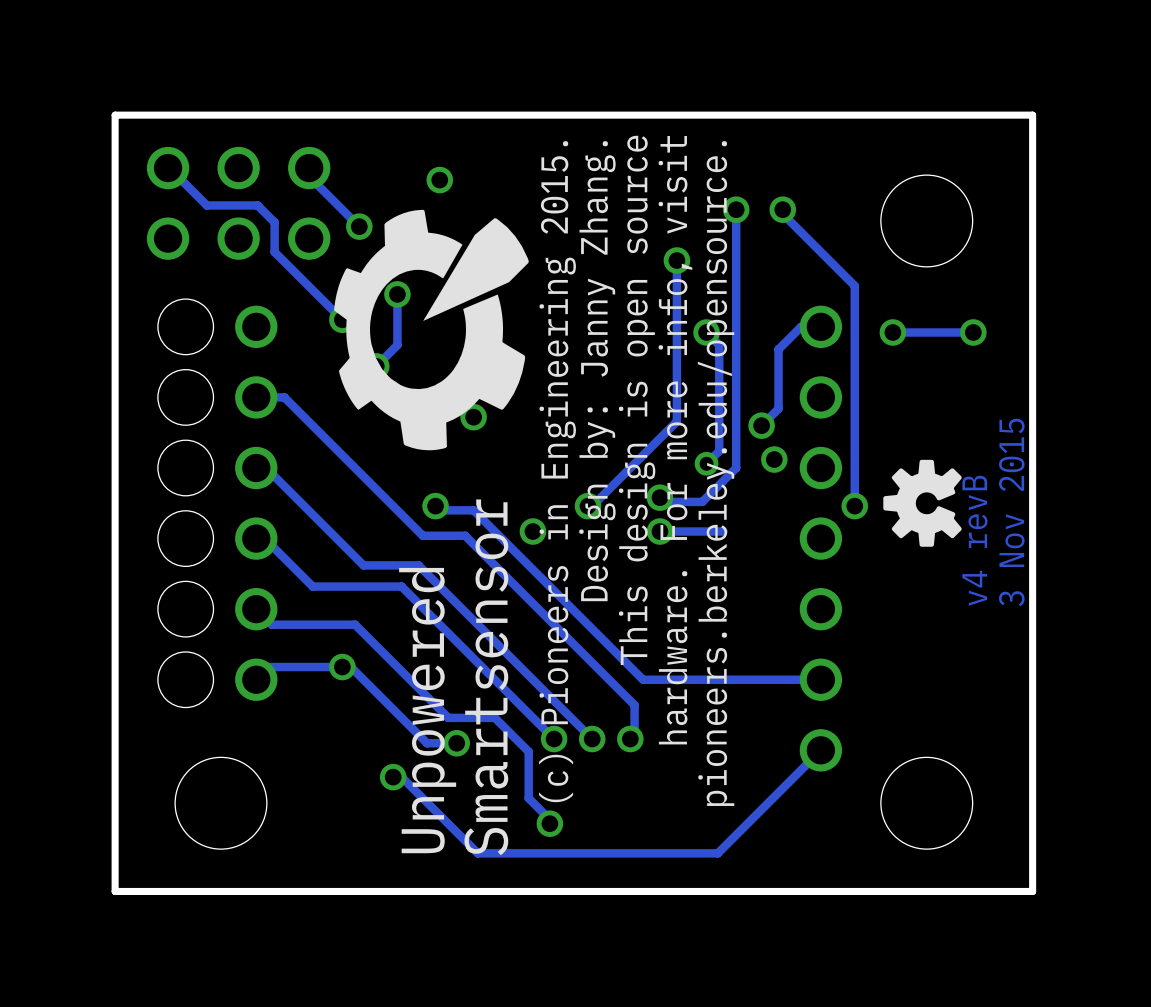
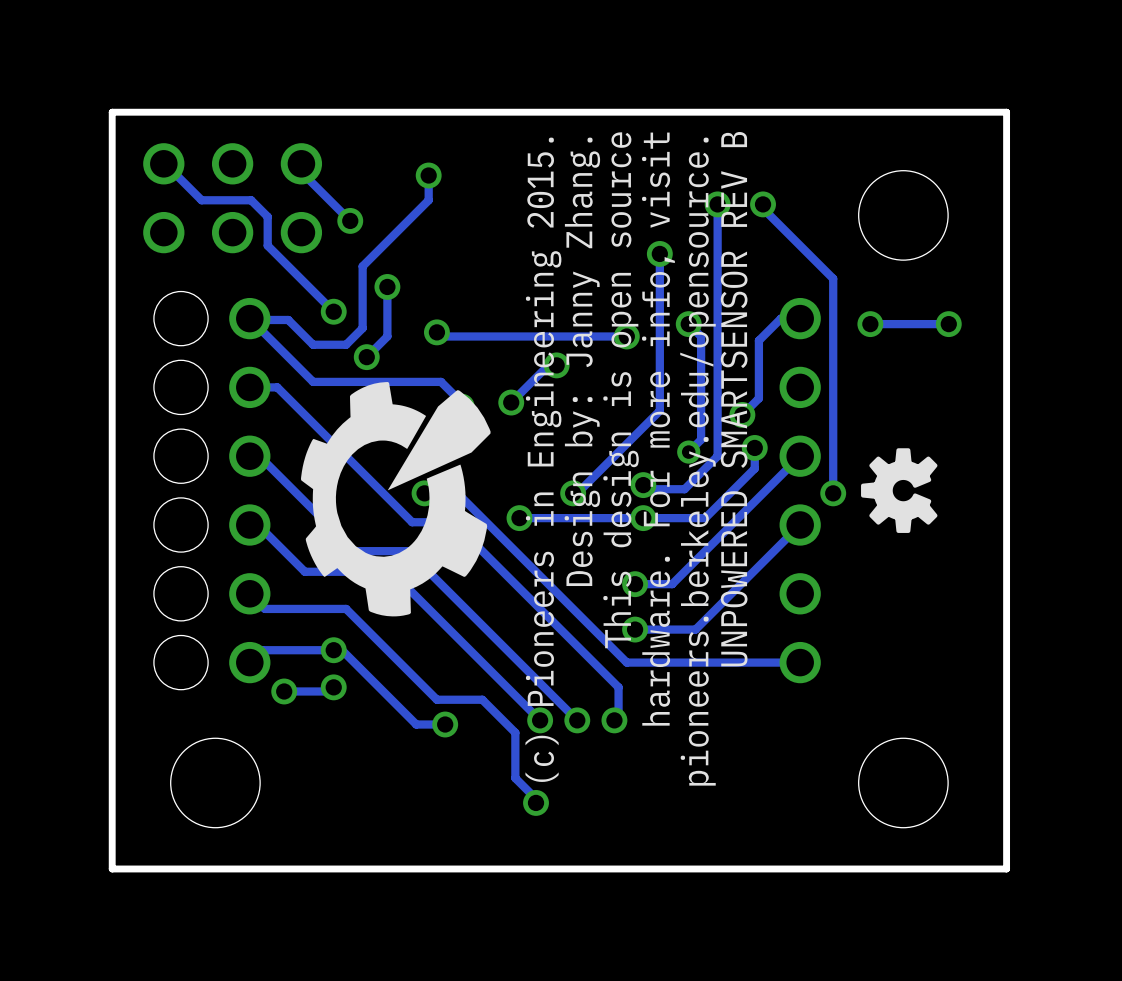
track: none -> (428, 175) (428, 200) (362, 266) (362, 328) (346, 344) (313, 344) (288, 319) (251, 319)
track: none -> (249, 318) (313, 381) (441, 381) (461, 402) (461, 406)
drawing position: (431, 330) -> (395, 499)
track: none -> (436, 332) (441, 336) (626, 336)
via: none -> (436, 332)
via: none -> (626, 336)
track: none -> (556, 365) (548, 365) (511, 402)
via: none -> (556, 365)
text: none -> UNPOWERED SMARTSENSOR REV B (734, 399)
via: none -> (511, 402)
track: none -> (754, 447) (754, 468) (705, 518)
track: none -> (800, 456) (672, 584) (635, 584)
part: none -> (800, 490)
text: 3 Nov 2015 (1011, 512) -> none
track: none -> (643, 518) (519, 518)
track: none -> (800, 525) (695, 629) (635, 629)
part: (820, 538) -> none
text: v4 revB (974, 540) -> none
via: none -> (635, 584)
via: none -> (635, 629)
text: Smartsensor (486, 677) -> none
track: none -> (333, 687) (329, 691) (284, 691)
via: none -> (333, 687)
via: none -> (284, 691)
text: Unpowered (427, 710) -> none
track: (820, 750) (717, 853) (477, 853) (401, 777) (393, 777) -> none
via: (393, 777) -> none

